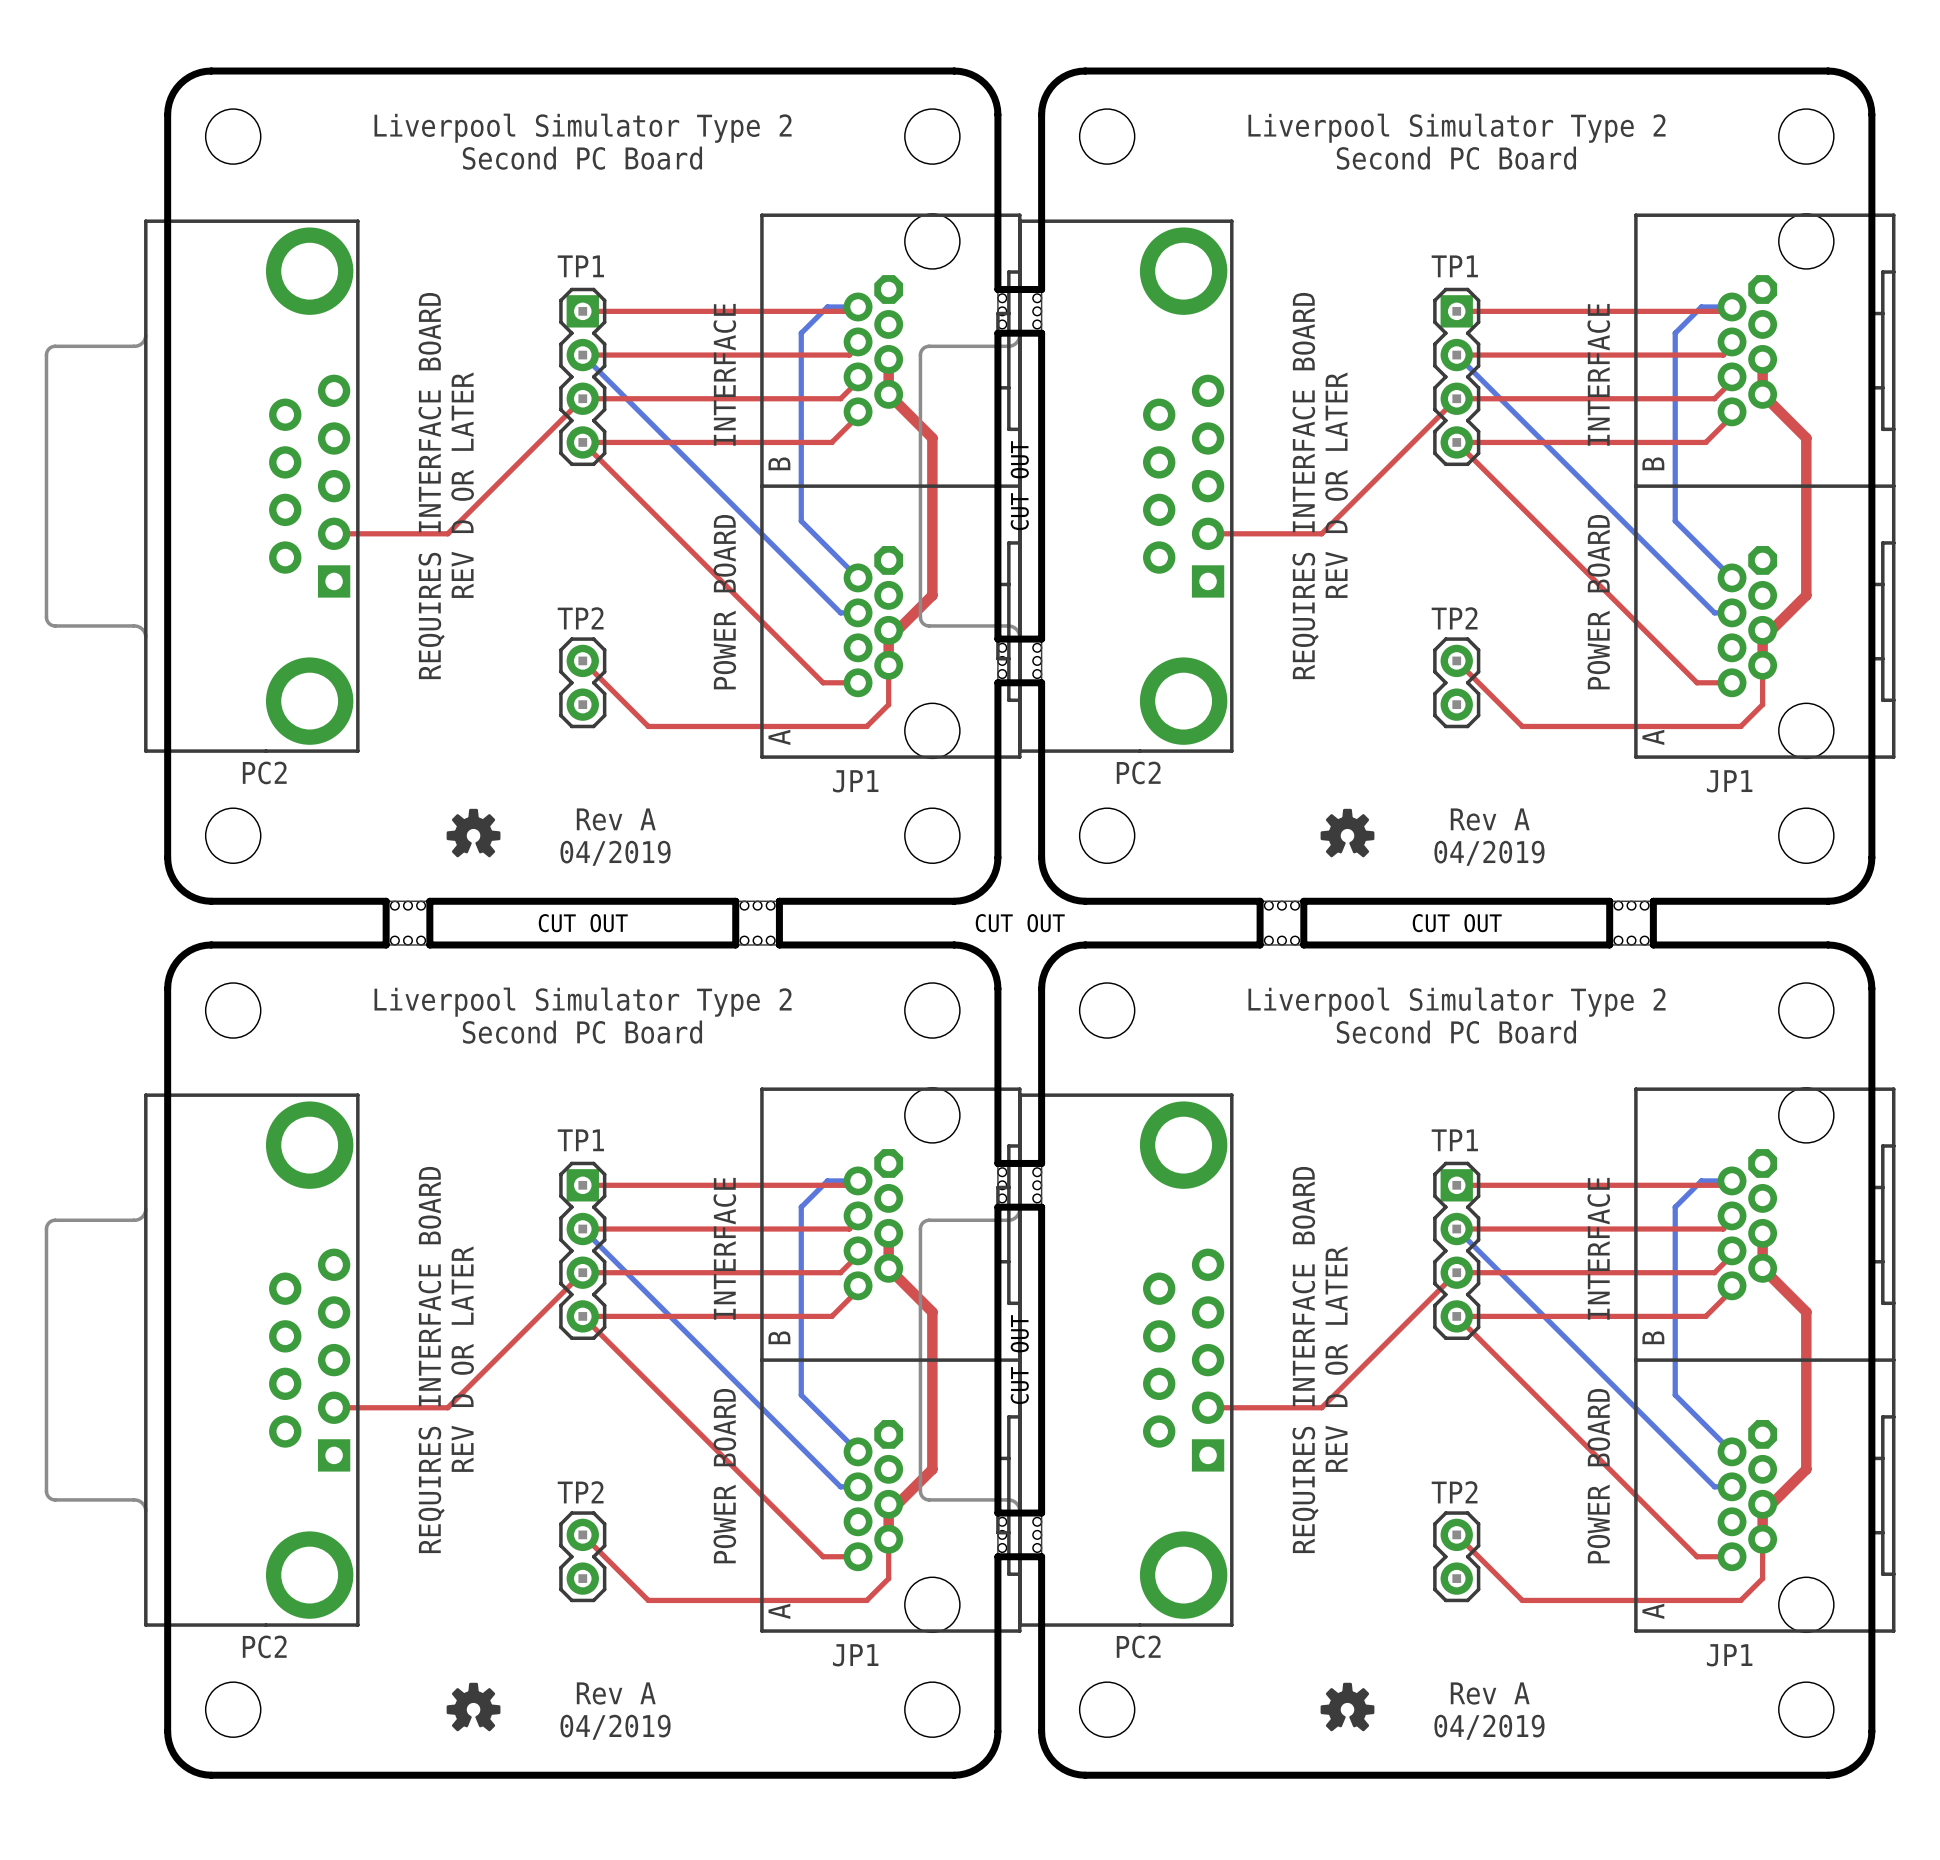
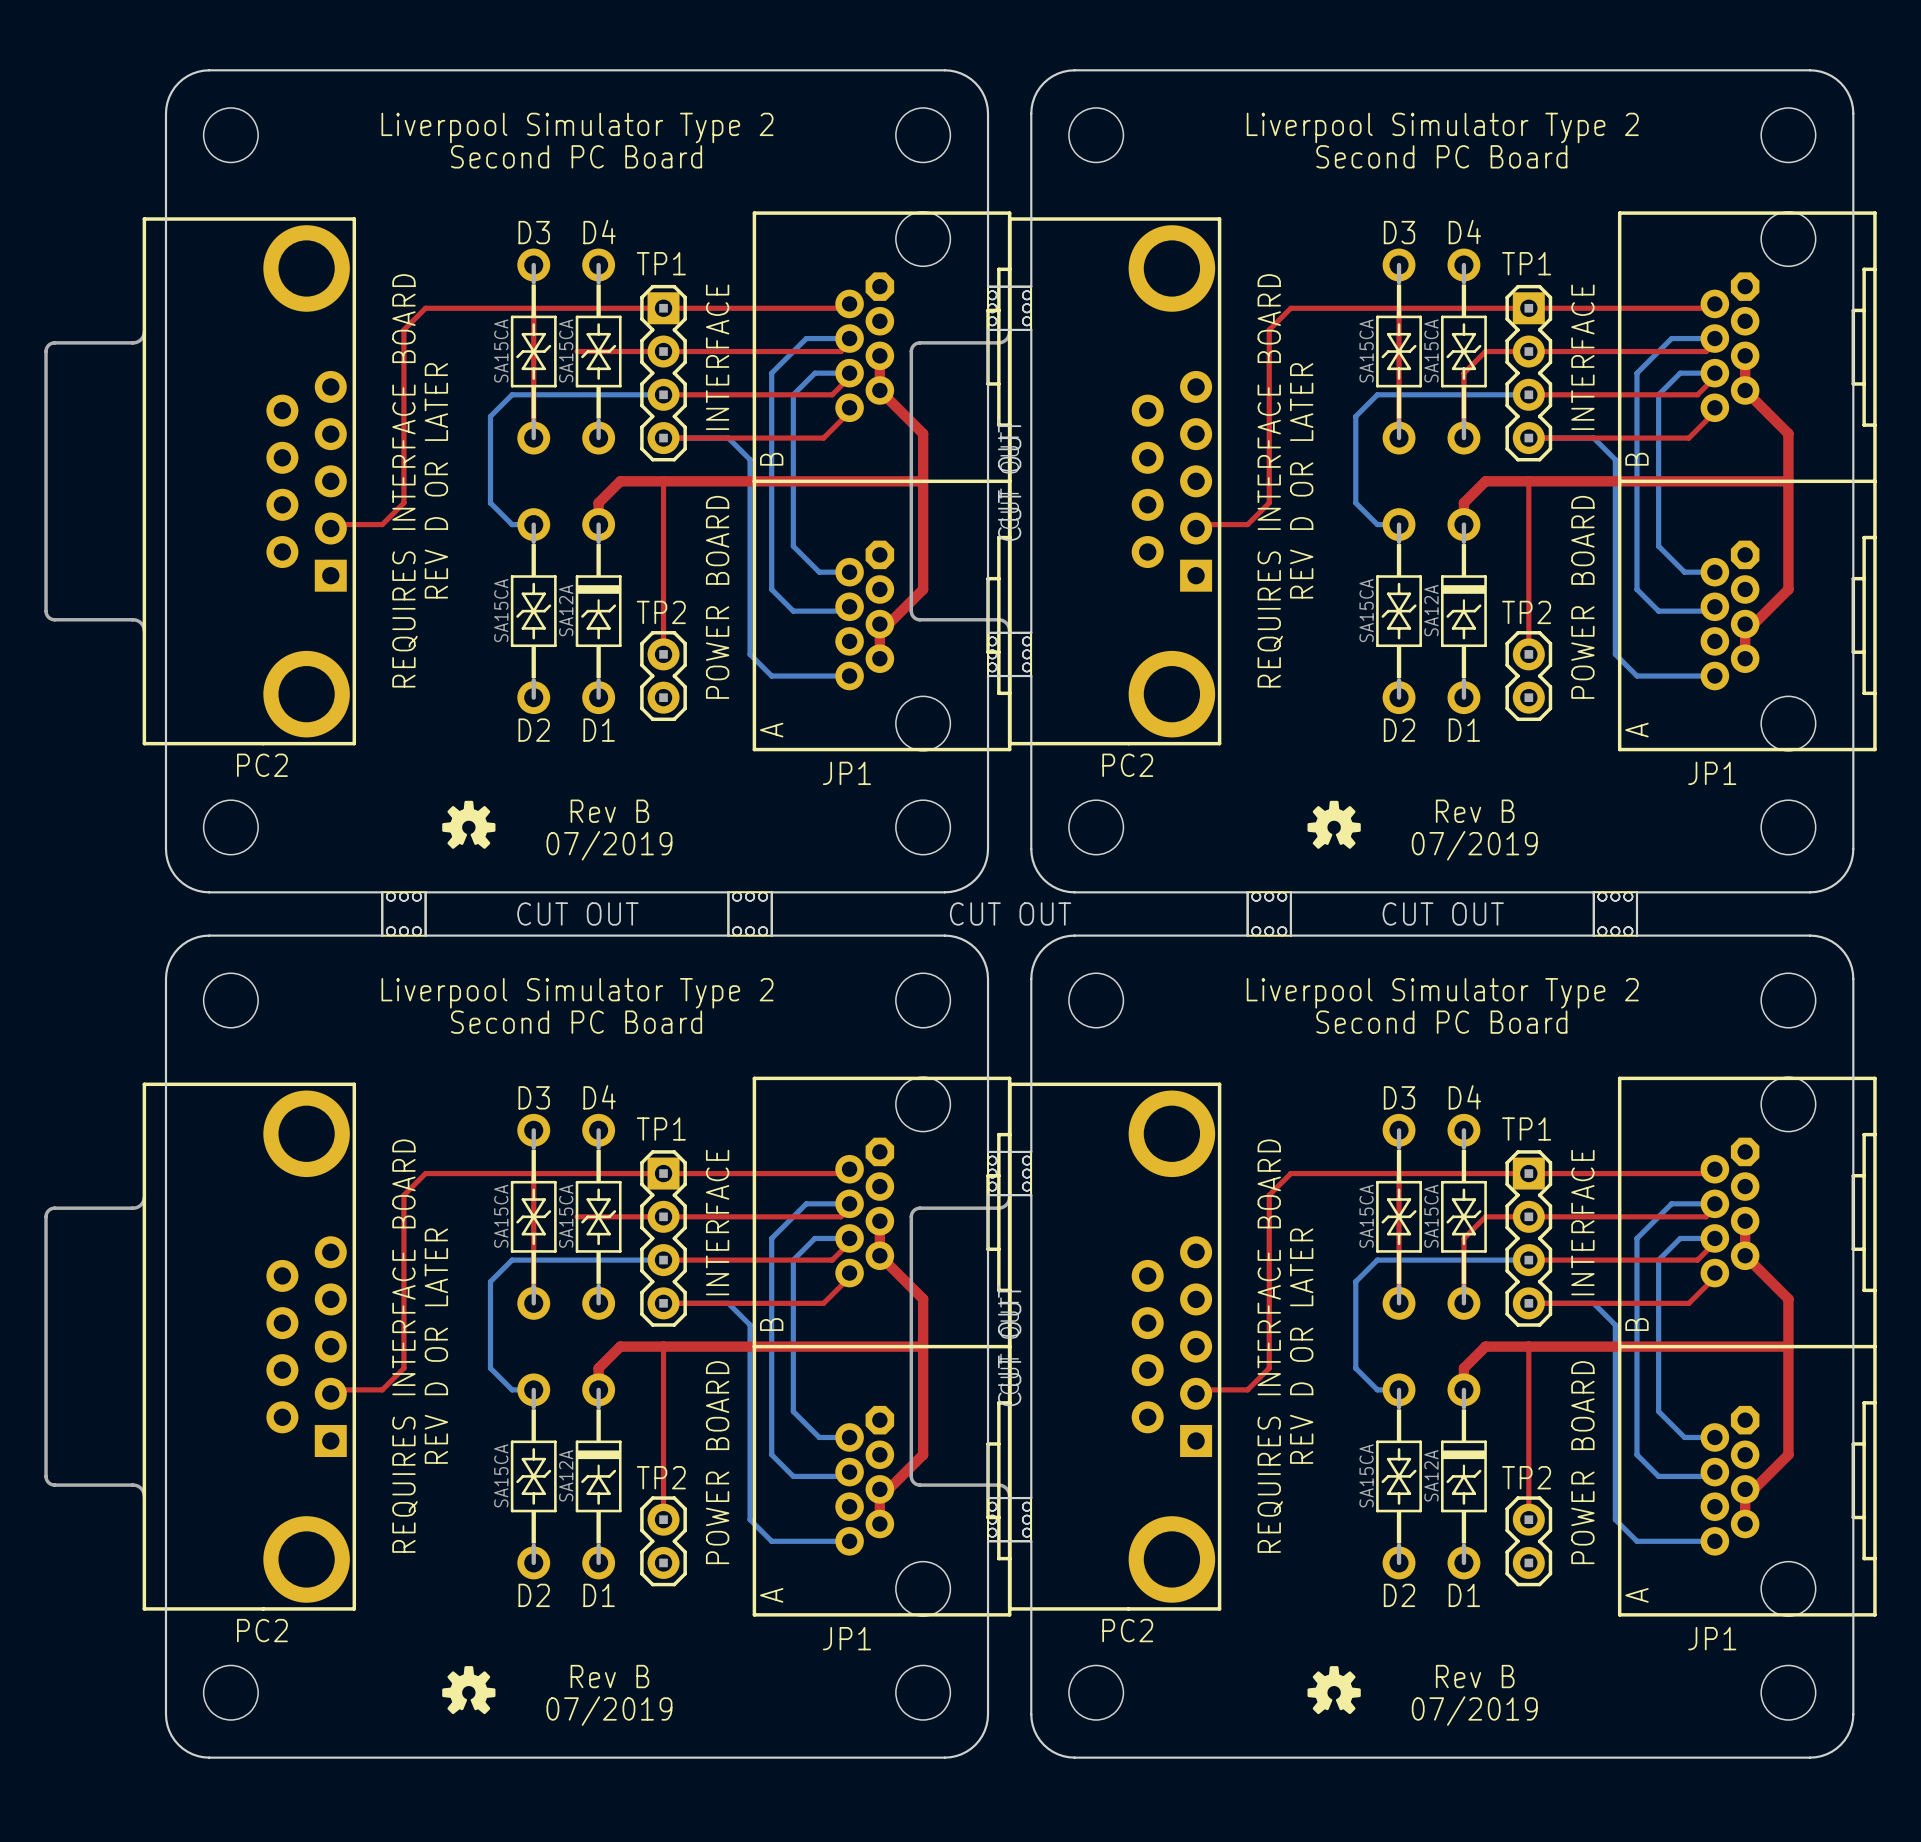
board edge: (211, 71) (965, 72) (985, 83) (994, 97) (997, 109) (997, 289) (1041, 289) (1041, 109) (1044, 97) (1054, 83) (1074, 72) (1828, 71) (1844, 74) (1859, 83) (1868, 97) (1871, 114) (1870, 868) (1859, 888) (1844, 897) (1833, 900) (1653, 901) (1653, 944) (1833, 945) (1844, 948) (1859, 957) (1870, 977) (1871, 1731) (1868, 1748) (1859, 1762) (1844, 1771) (1828, 1775) (1074, 1773) (1054, 1762) (1044, 1748) (1041, 1737) (1041, 1556) (997, 1556) (997, 1737) (994, 1748) (985, 1762) (965, 1773) (211, 1775) (194, 1771) (180, 1762) (170, 1748) (167, 1731) (169, 977) (180, 957) (194, 948) (205, 945) (386, 944) (386, 901) (205, 900) (194, 897) (180, 888) (169, 868) (167, 114) (170, 97) (180, 83) (194, 74) (211, 71) -> none
bottom track: (858, 306) (827, 306) (801, 333) (801, 398) -> (849, 373) (814, 373) (793, 394)
bottom track: (1732, 306) (1701, 306) (1675, 333) (1675, 398) -> (1714, 373) (1680, 373) (1658, 394)
top track: none -> (533, 308) (533, 438)
top track: none -> (1399, 308) (1399, 438)
board edge: (997, 333) (997, 639) (1041, 639) (1041, 333) (997, 333) -> none
part: none -> SA15CA (533, 351)
bottom track: (582, 355) (840, 612) (858, 612) -> (849, 338) (806, 338) (771, 373) (771, 589) (793, 611) (845, 611) (849, 606)
part: none -> SA15CA (598, 351)
part: none -> SA15CA (1399, 351)
top track: (1456, 355) (1500, 355) -> (1463, 438) (1463, 373) (1485, 351)
bottom track: (1456, 355) (1714, 612) (1732, 612) -> (1714, 338) (1671, 338) (1636, 373) (1636, 589) (1658, 611) (1710, 611) (1714, 606)
part: none -> SA15CA (1463, 351)
part position: (582, 376) -> (663, 373)
part position: (1456, 376) -> (1528, 373)
top track: (670, 398) (582, 398) (447, 533) (334, 533) -> (577, 308) (425, 308) (403, 329) (403, 502) (382, 524) (334, 524) (330, 528)
bottom track: none -> (663, 394) (512, 394) (490, 416) (490, 502) (512, 524) (533, 524)
top track: (1544, 398) (1456, 398) (1321, 533) (1208, 533) -> (1442, 308) (1290, 308) (1269, 329) (1269, 502) (1247, 524) (1200, 524) (1196, 528)
bottom track: none -> (1528, 394) (1377, 394) (1355, 416) (1355, 502) (1377, 524) (1399, 524)
top track: (670, 442) (582, 442) (823, 682) (858, 682) -> none
bottom track: none -> (663, 438) (728, 438) (750, 459) (750, 654) (771, 676) (849, 676)
top track: (1544, 442) (1456, 442) (1697, 682) (1732, 682) -> none
bottom track: none -> (1528, 438) (1593, 438) (1615, 459) (1615, 654) (1636, 676) (1714, 676)
text position: REV D OR LATER (462, 485) -> REV D OR LATER (436, 480)
text position: REV D OR LATER (1336, 485) -> REV D OR LATER (1301, 480)
text position: REQUIRES INTERFACE BOARD (431, 486) -> REQUIRES INTERFACE BOARD (404, 480)
top track: none -> (663, 481) (663, 654)
top track: none -> (923, 481) (620, 481) (598, 502) (598, 524)
text position: REQUIRES INTERFACE BOARD (1305, 486) -> REQUIRES INTERFACE BOARD (1270, 480)
top track: none -> (1528, 481) (1528, 654)
top track: none -> (1788, 481) (1485, 481) (1463, 502) (1463, 524)
bottom track: (801, 521) (858, 577) -> (793, 515) (793, 546) (819, 572) (849, 572)
bottom track: (1675, 521) (1732, 577) -> (1658, 515) (1658, 546) (1684, 572) (1714, 572)
part: none -> SA15CA (533, 611)
part: none -> SA12A (598, 611)
part: none -> SA15CA (1399, 611)
part: none -> SA12A (1463, 611)
top track: (582, 660) (648, 726) (866, 726) (888, 704) (888, 665) -> none
top track: (1456, 660) (1522, 726) (1740, 726) (1762, 704) (1762, 665) -> none
part position: (582, 682) -> (663, 676)
board edge: (997, 682) (997, 857) (996, 868) (988, 884) (976, 895) (959, 900) (779, 901) (779, 944) (954, 944) (965, 946) (980, 954) (992, 966) (997, 982) (997, 1163) (1041, 1163) (1041, 988) (1043, 977) (1050, 962) (1063, 950) (1079, 945) (1260, 944) (1260, 901) (1085, 901) (1074, 899) (1058, 892) (1047, 879) (1041, 863) (1041, 682) (997, 682) -> none
part position: (1456, 682) -> (1528, 676)
text: Rev A (616, 819) -> Rev B (609, 811)
text: Rev A (1490, 819) -> Rev B (1475, 811)
text: 04/2019 (615, 853) -> 07/2019 (609, 845)
text: 04/2019 (1489, 853) -> 07/2019 (1474, 845)
board edge: (429, 901) (735, 901) (735, 944) (429, 944) (429, 901) -> none
board edge: (1303, 901) (1609, 901) (1609, 944) (1303, 944) (1303, 901) -> none
text: CUT OUT (583, 923) -> none
part: none -> (1009, 913)
text: CUT OUT (1020, 923) -> none
text: CUT OUT (1457, 923) -> none
bottom track: (858, 1180) (827, 1180) (801, 1207) (801, 1272) -> (849, 1238) (814, 1238) (793, 1260)
bottom track: (1732, 1180) (1701, 1180) (1675, 1207) (1675, 1272) -> (1714, 1238) (1680, 1238) (1658, 1260)
top track: none -> (533, 1173) (533, 1303)
top track: none -> (1399, 1173) (1399, 1303)
board edge: (997, 1207) (997, 1513) (1041, 1513) (1041, 1207) (997, 1207) -> none
D3: none -> SA15CA (533, 1216)
bottom track: (582, 1229) (840, 1486) (858, 1486) -> (849, 1203) (806, 1203) (771, 1238) (771, 1454) (793, 1476) (845, 1476) (849, 1472)
D4: none -> SA15CA (598, 1216)
part: none -> SA15CA (1399, 1216)
top track: (1456, 1229) (1500, 1229) -> (1463, 1303) (1463, 1238) (1485, 1216)
bottom track: (1456, 1229) (1714, 1486) (1732, 1486) -> (1714, 1203) (1671, 1203) (1636, 1238) (1636, 1454) (1658, 1476) (1710, 1476) (1714, 1472)
part: none -> SA15CA (1463, 1216)
TP1 position: (582, 1250) -> (663, 1238)
part position: (1456, 1250) -> (1528, 1238)
top track: (670, 1272) (582, 1272) (447, 1407) (334, 1407) -> (577, 1173) (425, 1173) (403, 1195) (403, 1368) (382, 1389) (334, 1389) (330, 1393)
bottom track: none -> (663, 1260) (512, 1260) (490, 1281) (490, 1368) (512, 1389) (533, 1389)
top track: (1544, 1272) (1456, 1272) (1321, 1407) (1208, 1407) -> (1442, 1173) (1290, 1173) (1269, 1195) (1269, 1368) (1247, 1389) (1200, 1389) (1196, 1393)
bottom track: none -> (1528, 1260) (1377, 1260) (1355, 1281) (1355, 1368) (1377, 1389) (1399, 1389)
top track: (670, 1316) (582, 1316) (823, 1556) (858, 1556) -> none
bottom track: none -> (663, 1303) (728, 1303) (750, 1324) (750, 1519) (771, 1541) (849, 1541)
top track: (1544, 1316) (1456, 1316) (1697, 1556) (1732, 1556) -> none
bottom track: none -> (1528, 1303) (1593, 1303) (1615, 1324) (1615, 1519) (1636, 1541) (1714, 1541)
text position: REV D OR LATER (462, 1359) -> REV D OR LATER (436, 1346)
text position: REV D OR LATER (1336, 1359) -> REV D OR LATER (1301, 1346)
text position: REQUIRES INTERFACE BOARD (431, 1360) -> REQUIRES INTERFACE BOARD (404, 1346)
top track: none -> (663, 1346) (663, 1519)
top track: none -> (923, 1346) (620, 1346) (598, 1368) (598, 1389)
text position: REQUIRES INTERFACE BOARD (1305, 1360) -> REQUIRES INTERFACE BOARD (1270, 1346)
top track: none -> (1528, 1346) (1528, 1519)
top track: none -> (1788, 1346) (1485, 1346) (1463, 1368) (1463, 1389)
bottom track: (801, 1395) (858, 1451) -> (793, 1381) (793, 1411) (819, 1437) (849, 1437)
bottom track: (1675, 1395) (1732, 1451) -> (1658, 1381) (1658, 1411) (1684, 1437) (1714, 1437)
D2: none -> SA15CA (533, 1476)
D1: none -> SA12A (598, 1476)
part: none -> SA15CA (1399, 1476)
part: none -> SA12A (1463, 1476)
top track: (582, 1534) (648, 1600) (866, 1600) (888, 1578) (888, 1539) -> none
top track: (1456, 1534) (1522, 1600) (1740, 1600) (1762, 1578) (1762, 1539) -> none
TP2 position: (582, 1556) -> (663, 1541)
part position: (1456, 1556) -> (1528, 1541)
text: Rev A (616, 1693) -> Rev B (609, 1676)
text: Rev A (1490, 1693) -> Rev B (1475, 1676)
text: 04/2019 (615, 1727) -> 07/2019 (609, 1711)
text: 04/2019 (1489, 1727) -> 07/2019 (1474, 1711)

